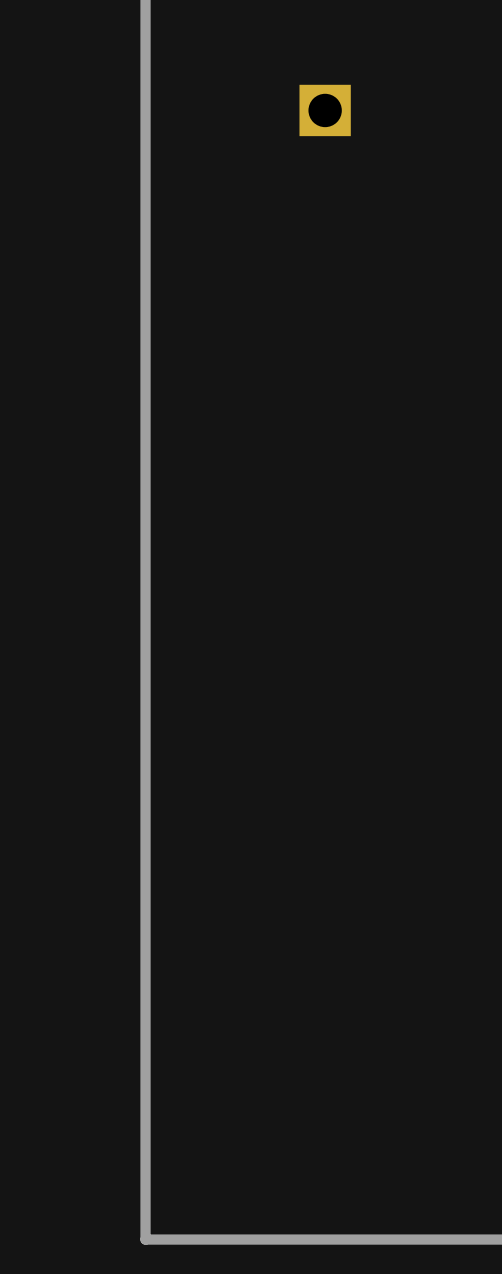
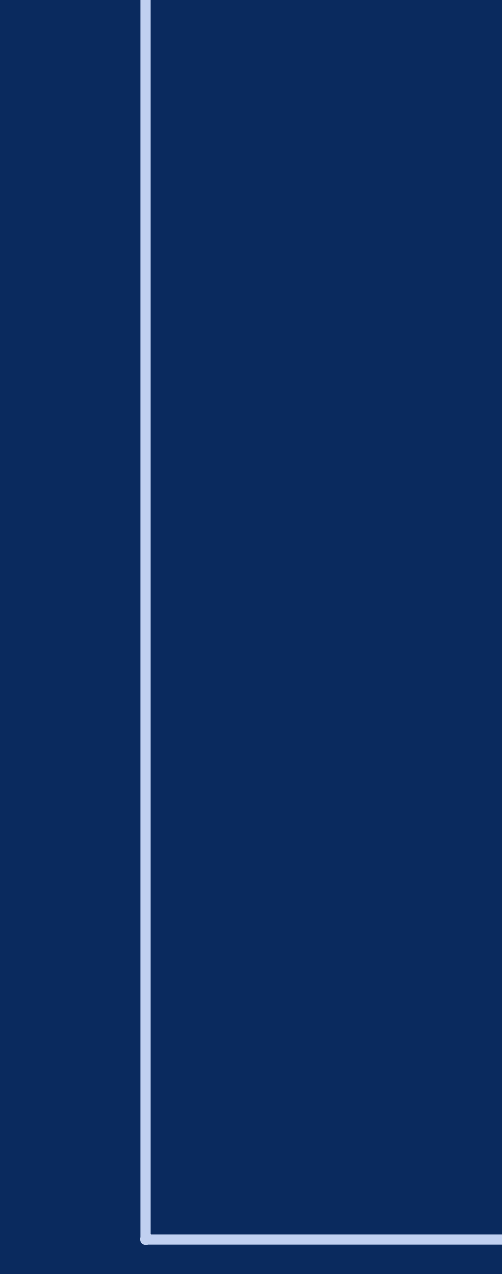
part: (325, 110) -> none

